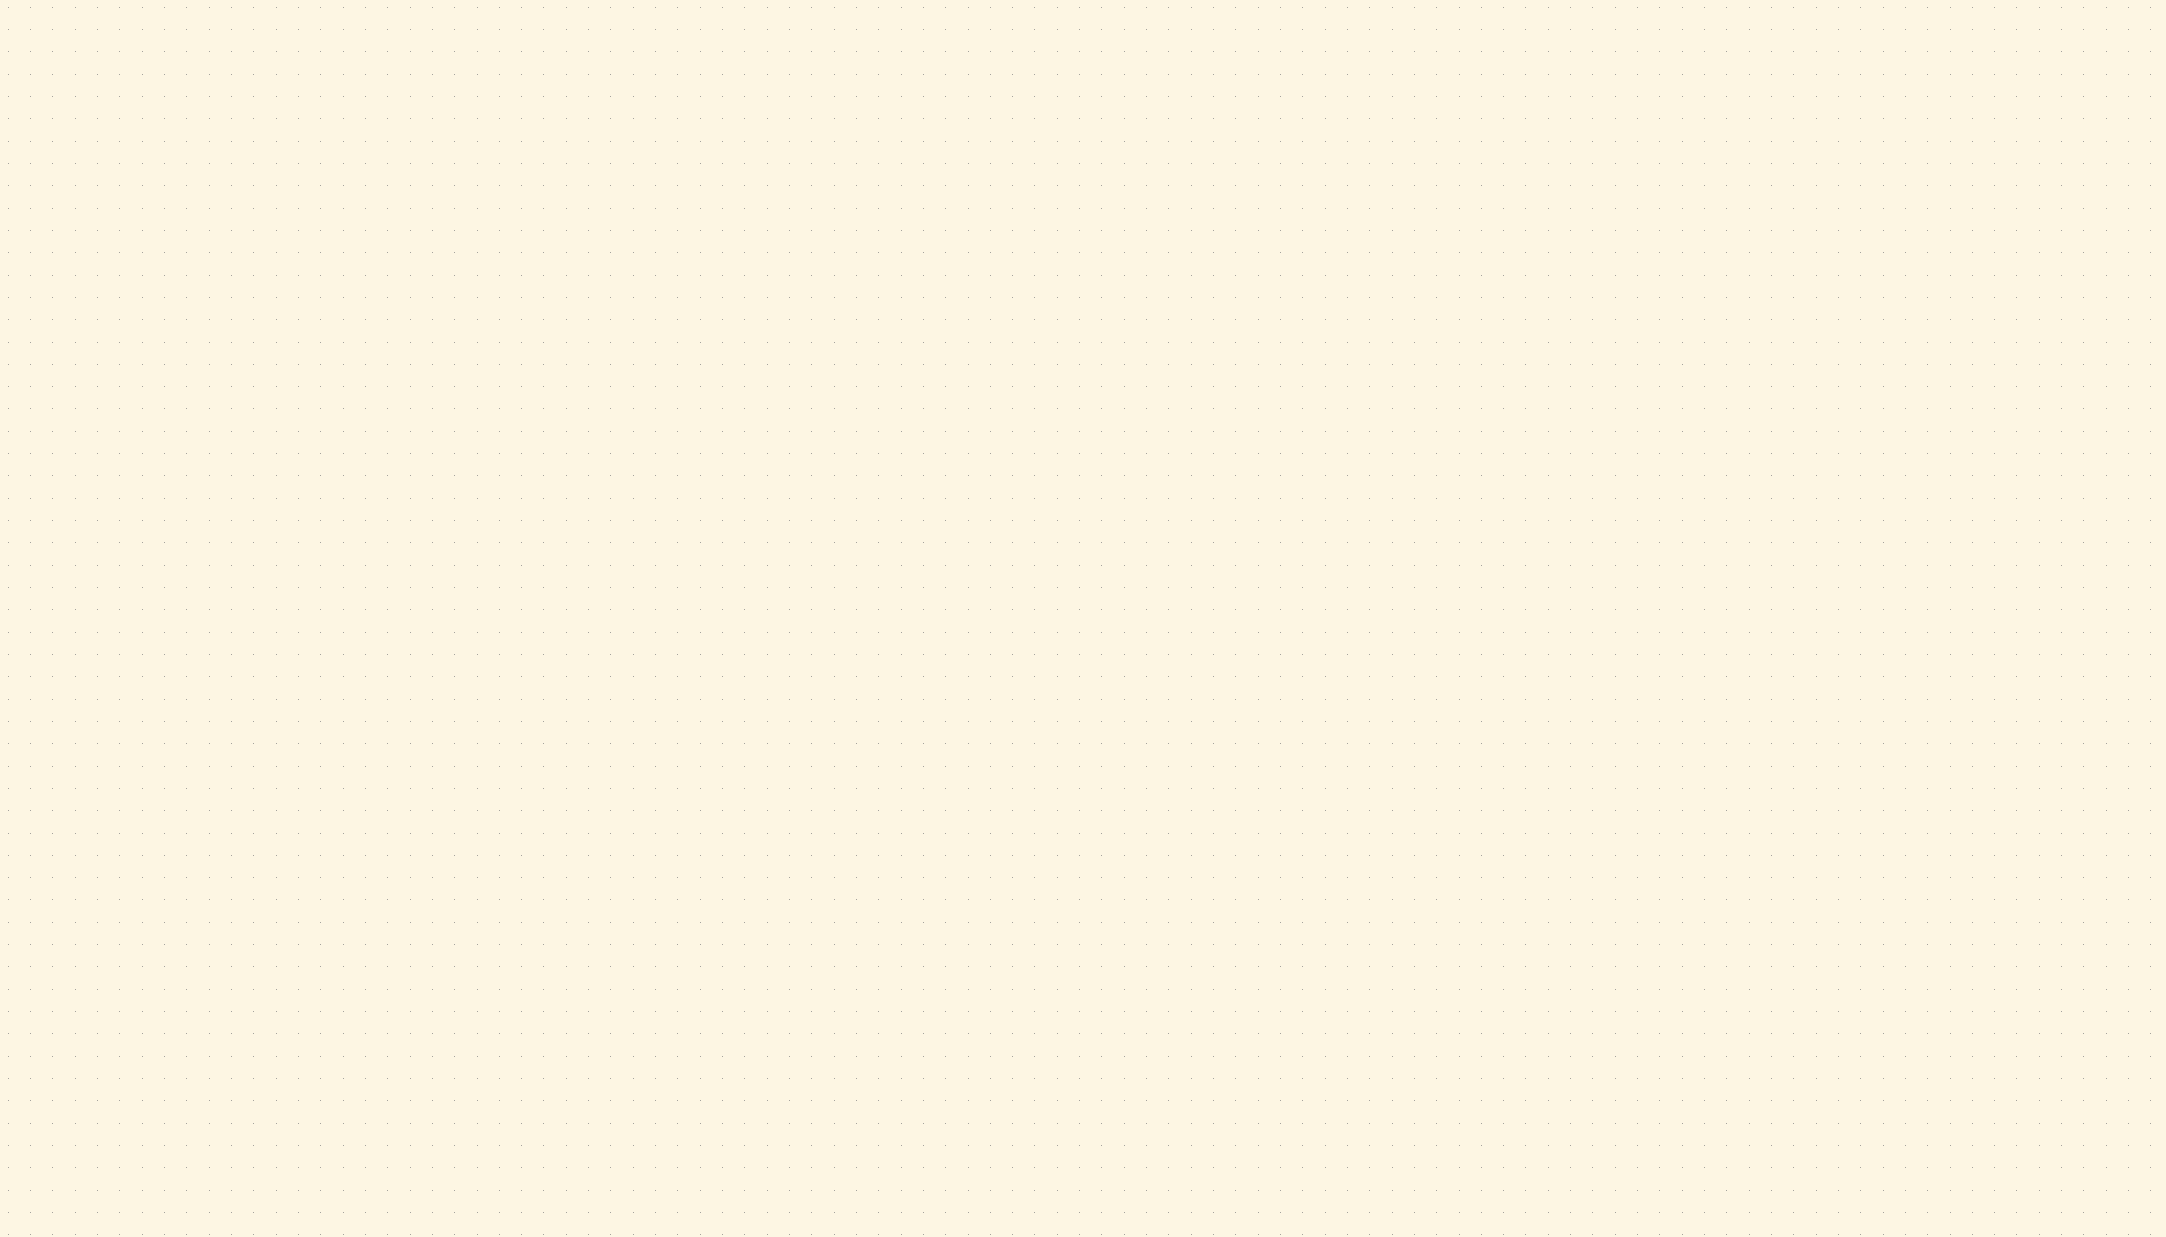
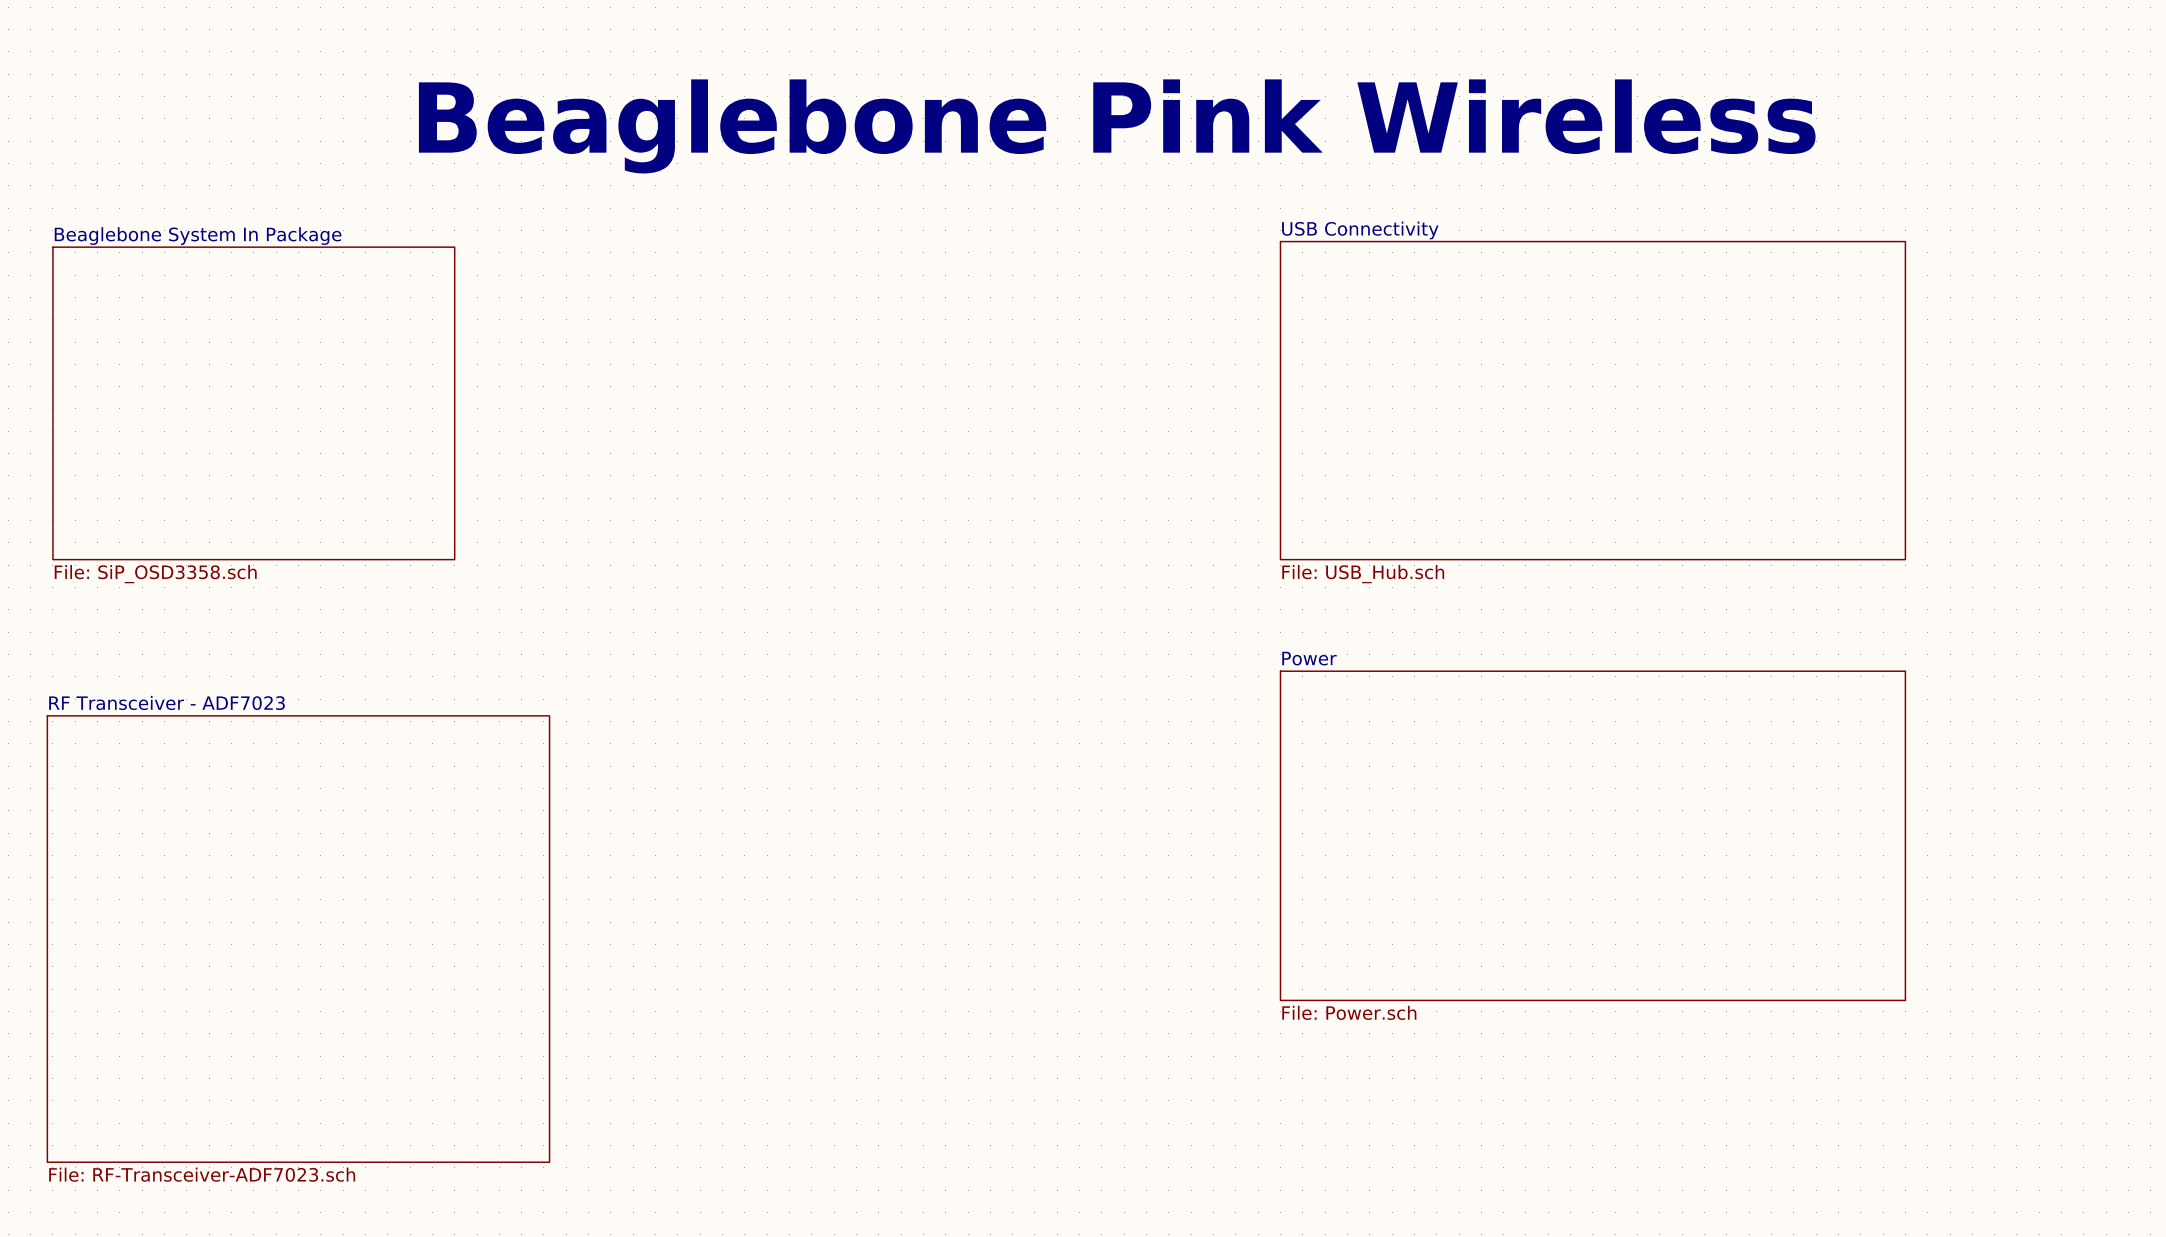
text: none -> Beaglebone Pink Wireless (1117, 126)
sheet USB Connectivity: none -> File: USB_Hub.sch (1592, 400)
sheet Beaglebone System In Package: none -> File: SiP_OSD3358.sch (253, 403)
sheet Power: none -> File: Power.sch (1592, 835)
sheet RF Transceiver - ADF7023: none -> File: RF-Transceiver-ADF7023.sch (298, 939)

